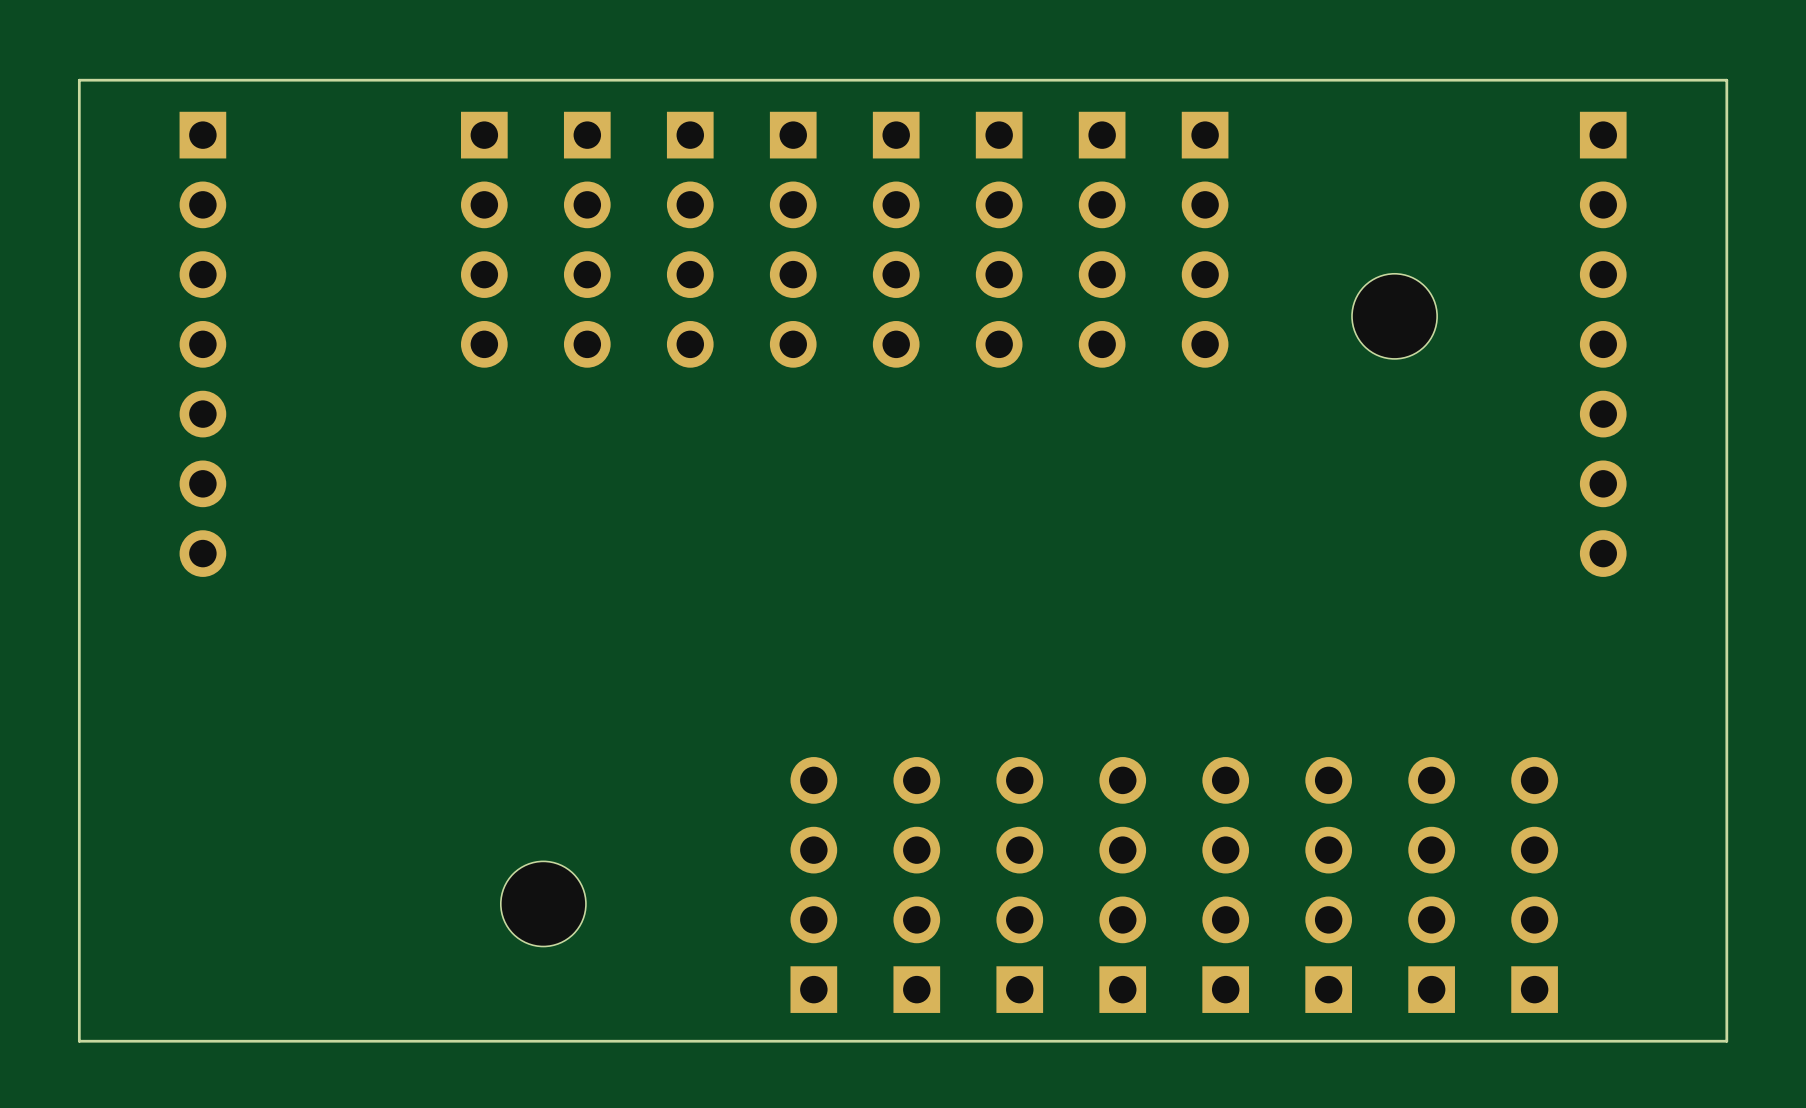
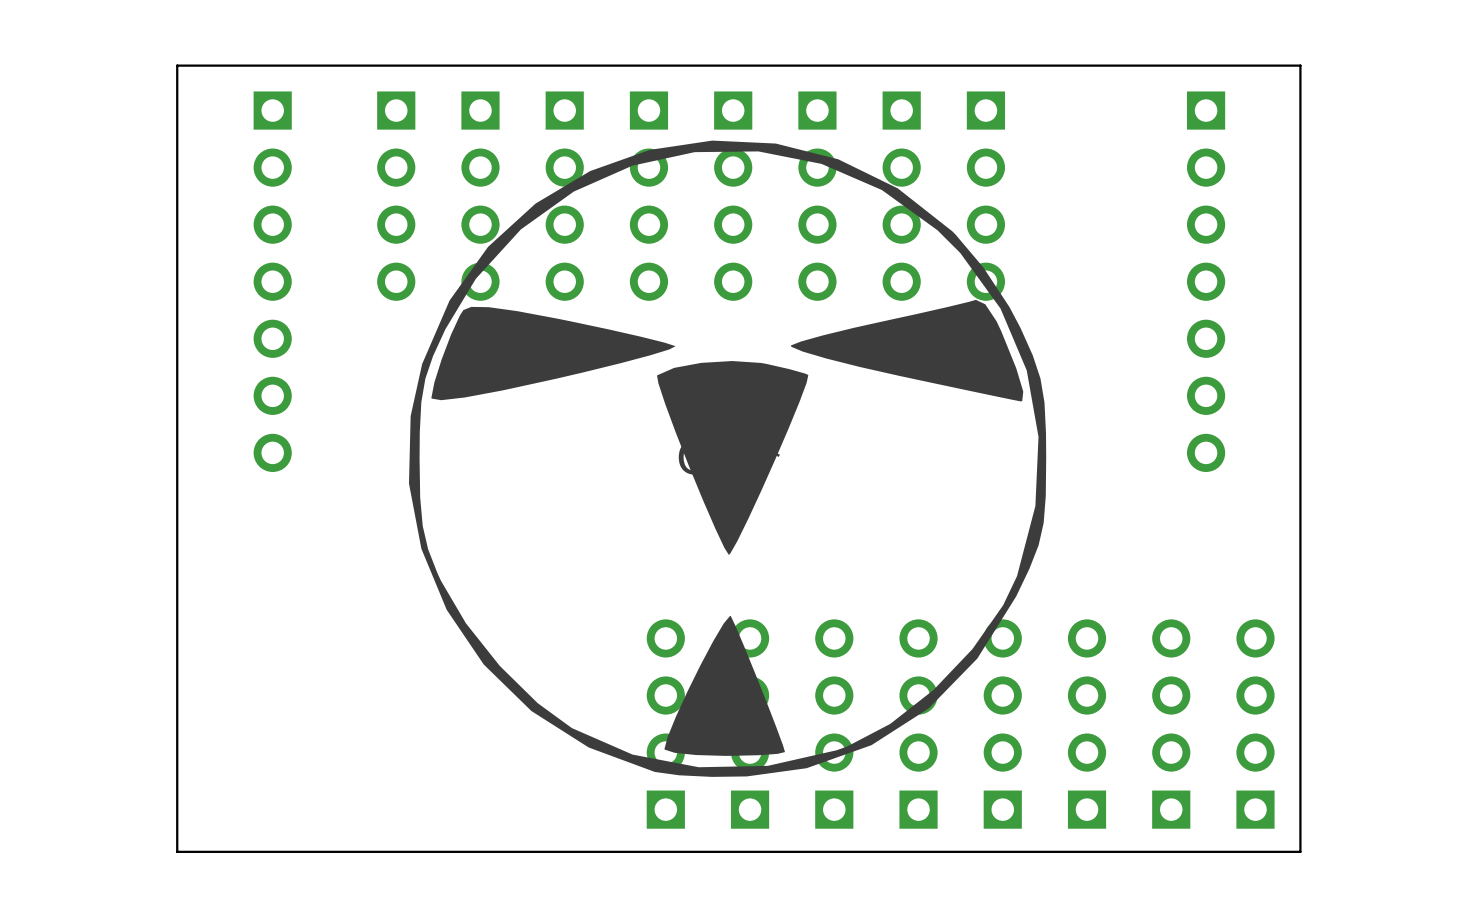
board edge: (216, 80) (79, 80) (79, 1041) (216, 1041) -> (177, 65) (177, 851)
board edge: (1589, 80) (1726, 80) (1726, 1041) (1589, 1041) -> (1300, 65) (1300, 851)
part: (1394, 316) -> none
part position: (202, 344) -> (272, 281)
part position: (1603, 344) -> (1206, 281)
part: none -> (727, 458)
part: (543, 903) -> none

